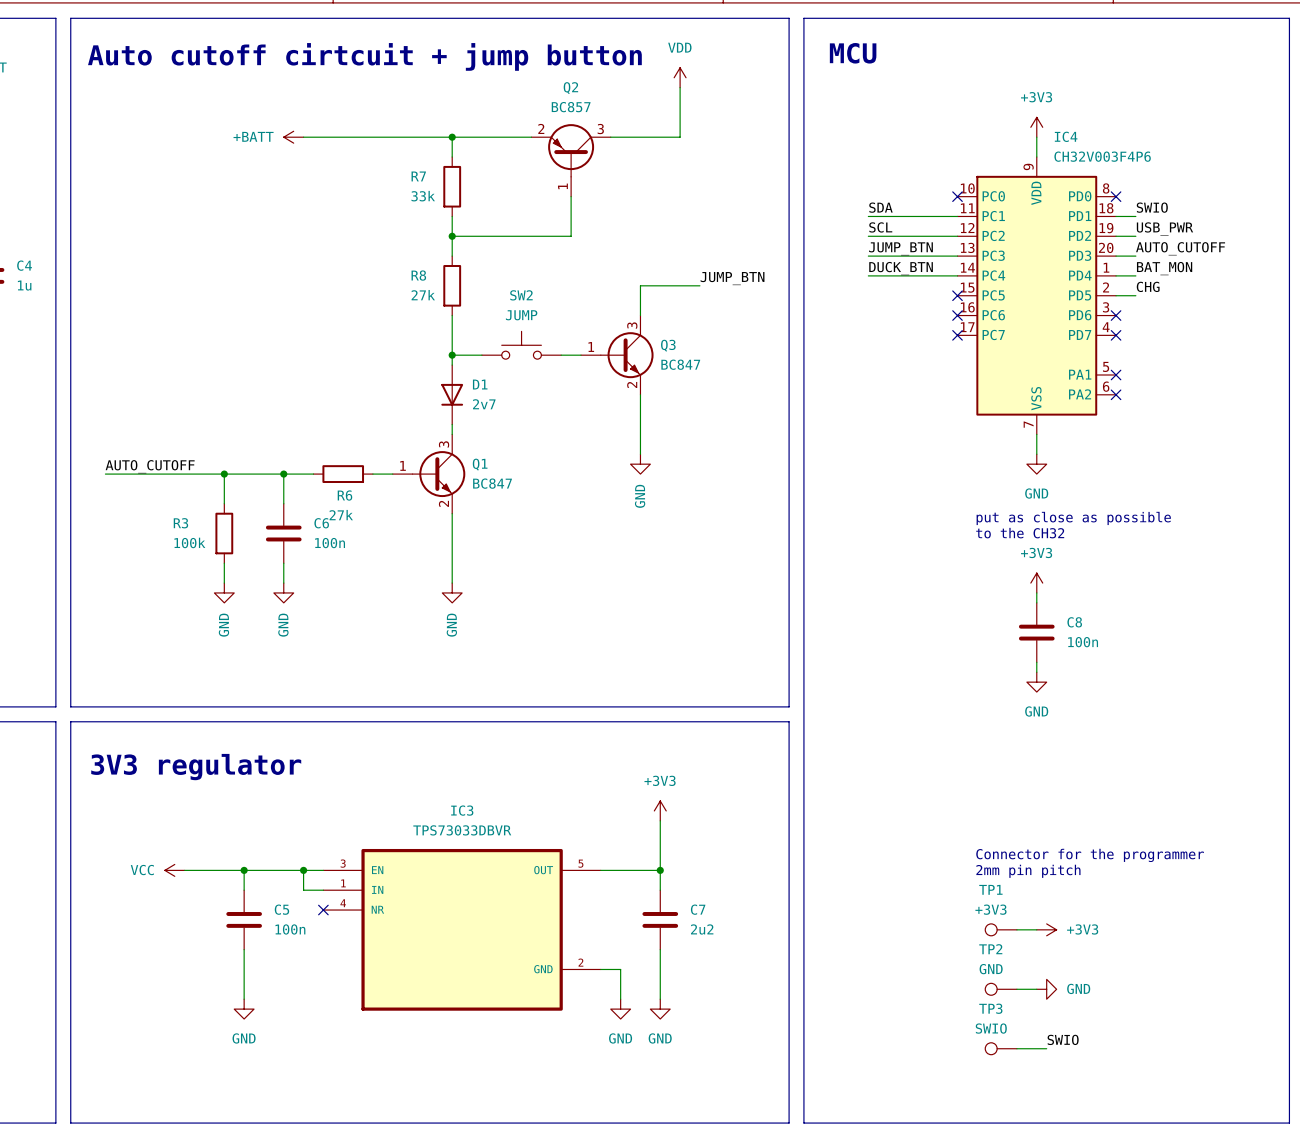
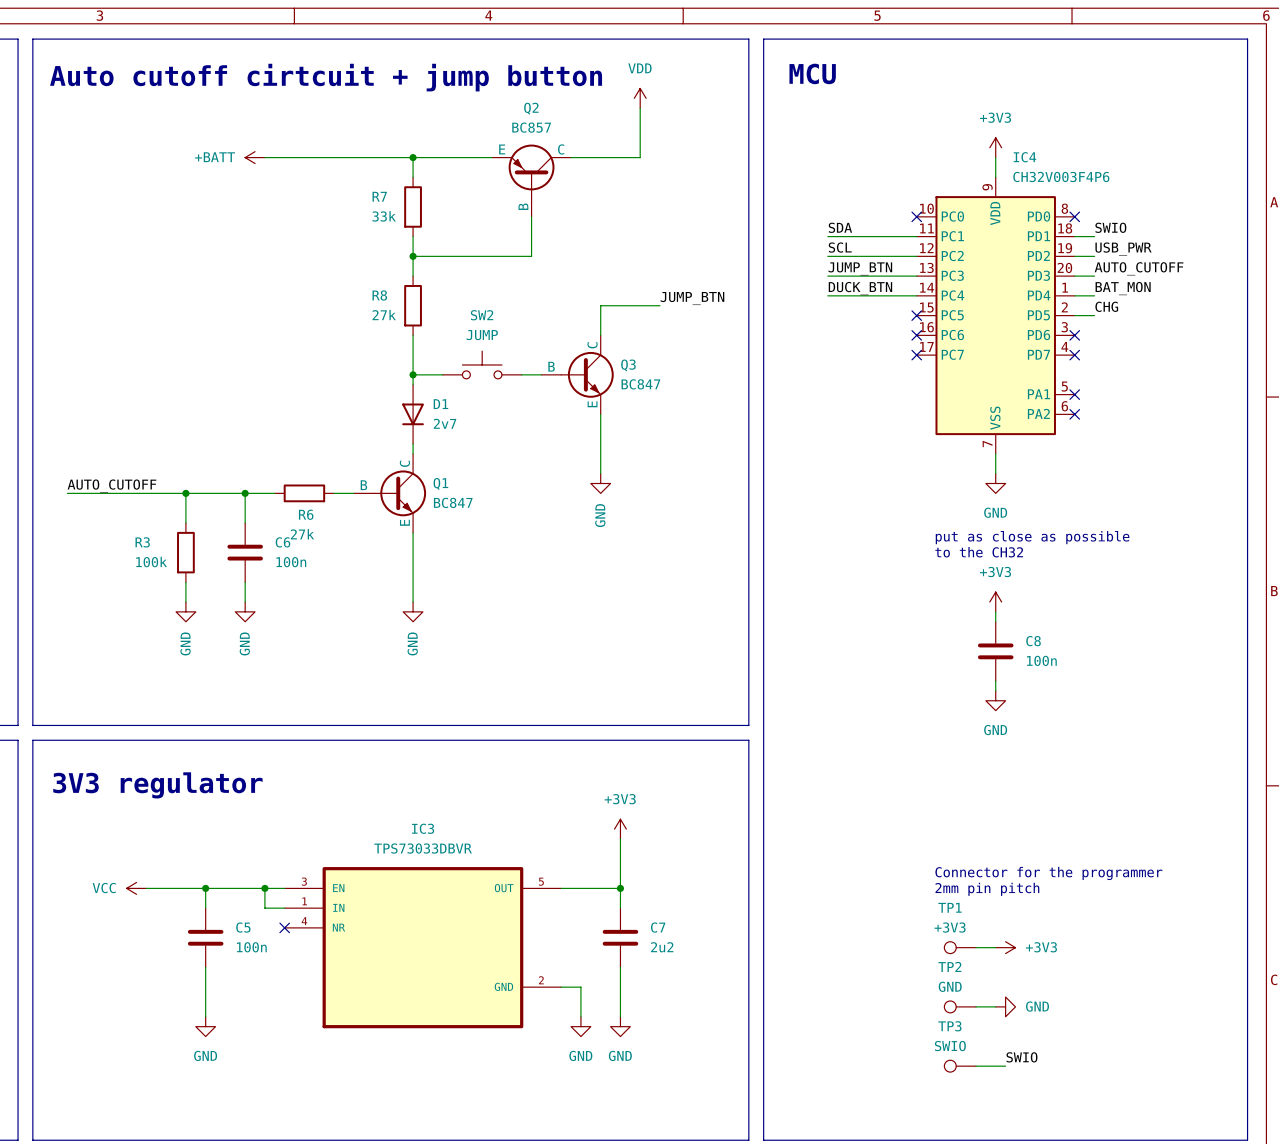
Q2 symbol: [531, 124, 611, 197] -> [492, 144, 572, 217]
Q3 symbol: [581, 315, 654, 395] -> [541, 335, 614, 415]
Q1 symbol: [392, 434, 466, 514] -> [353, 453, 427, 533]

